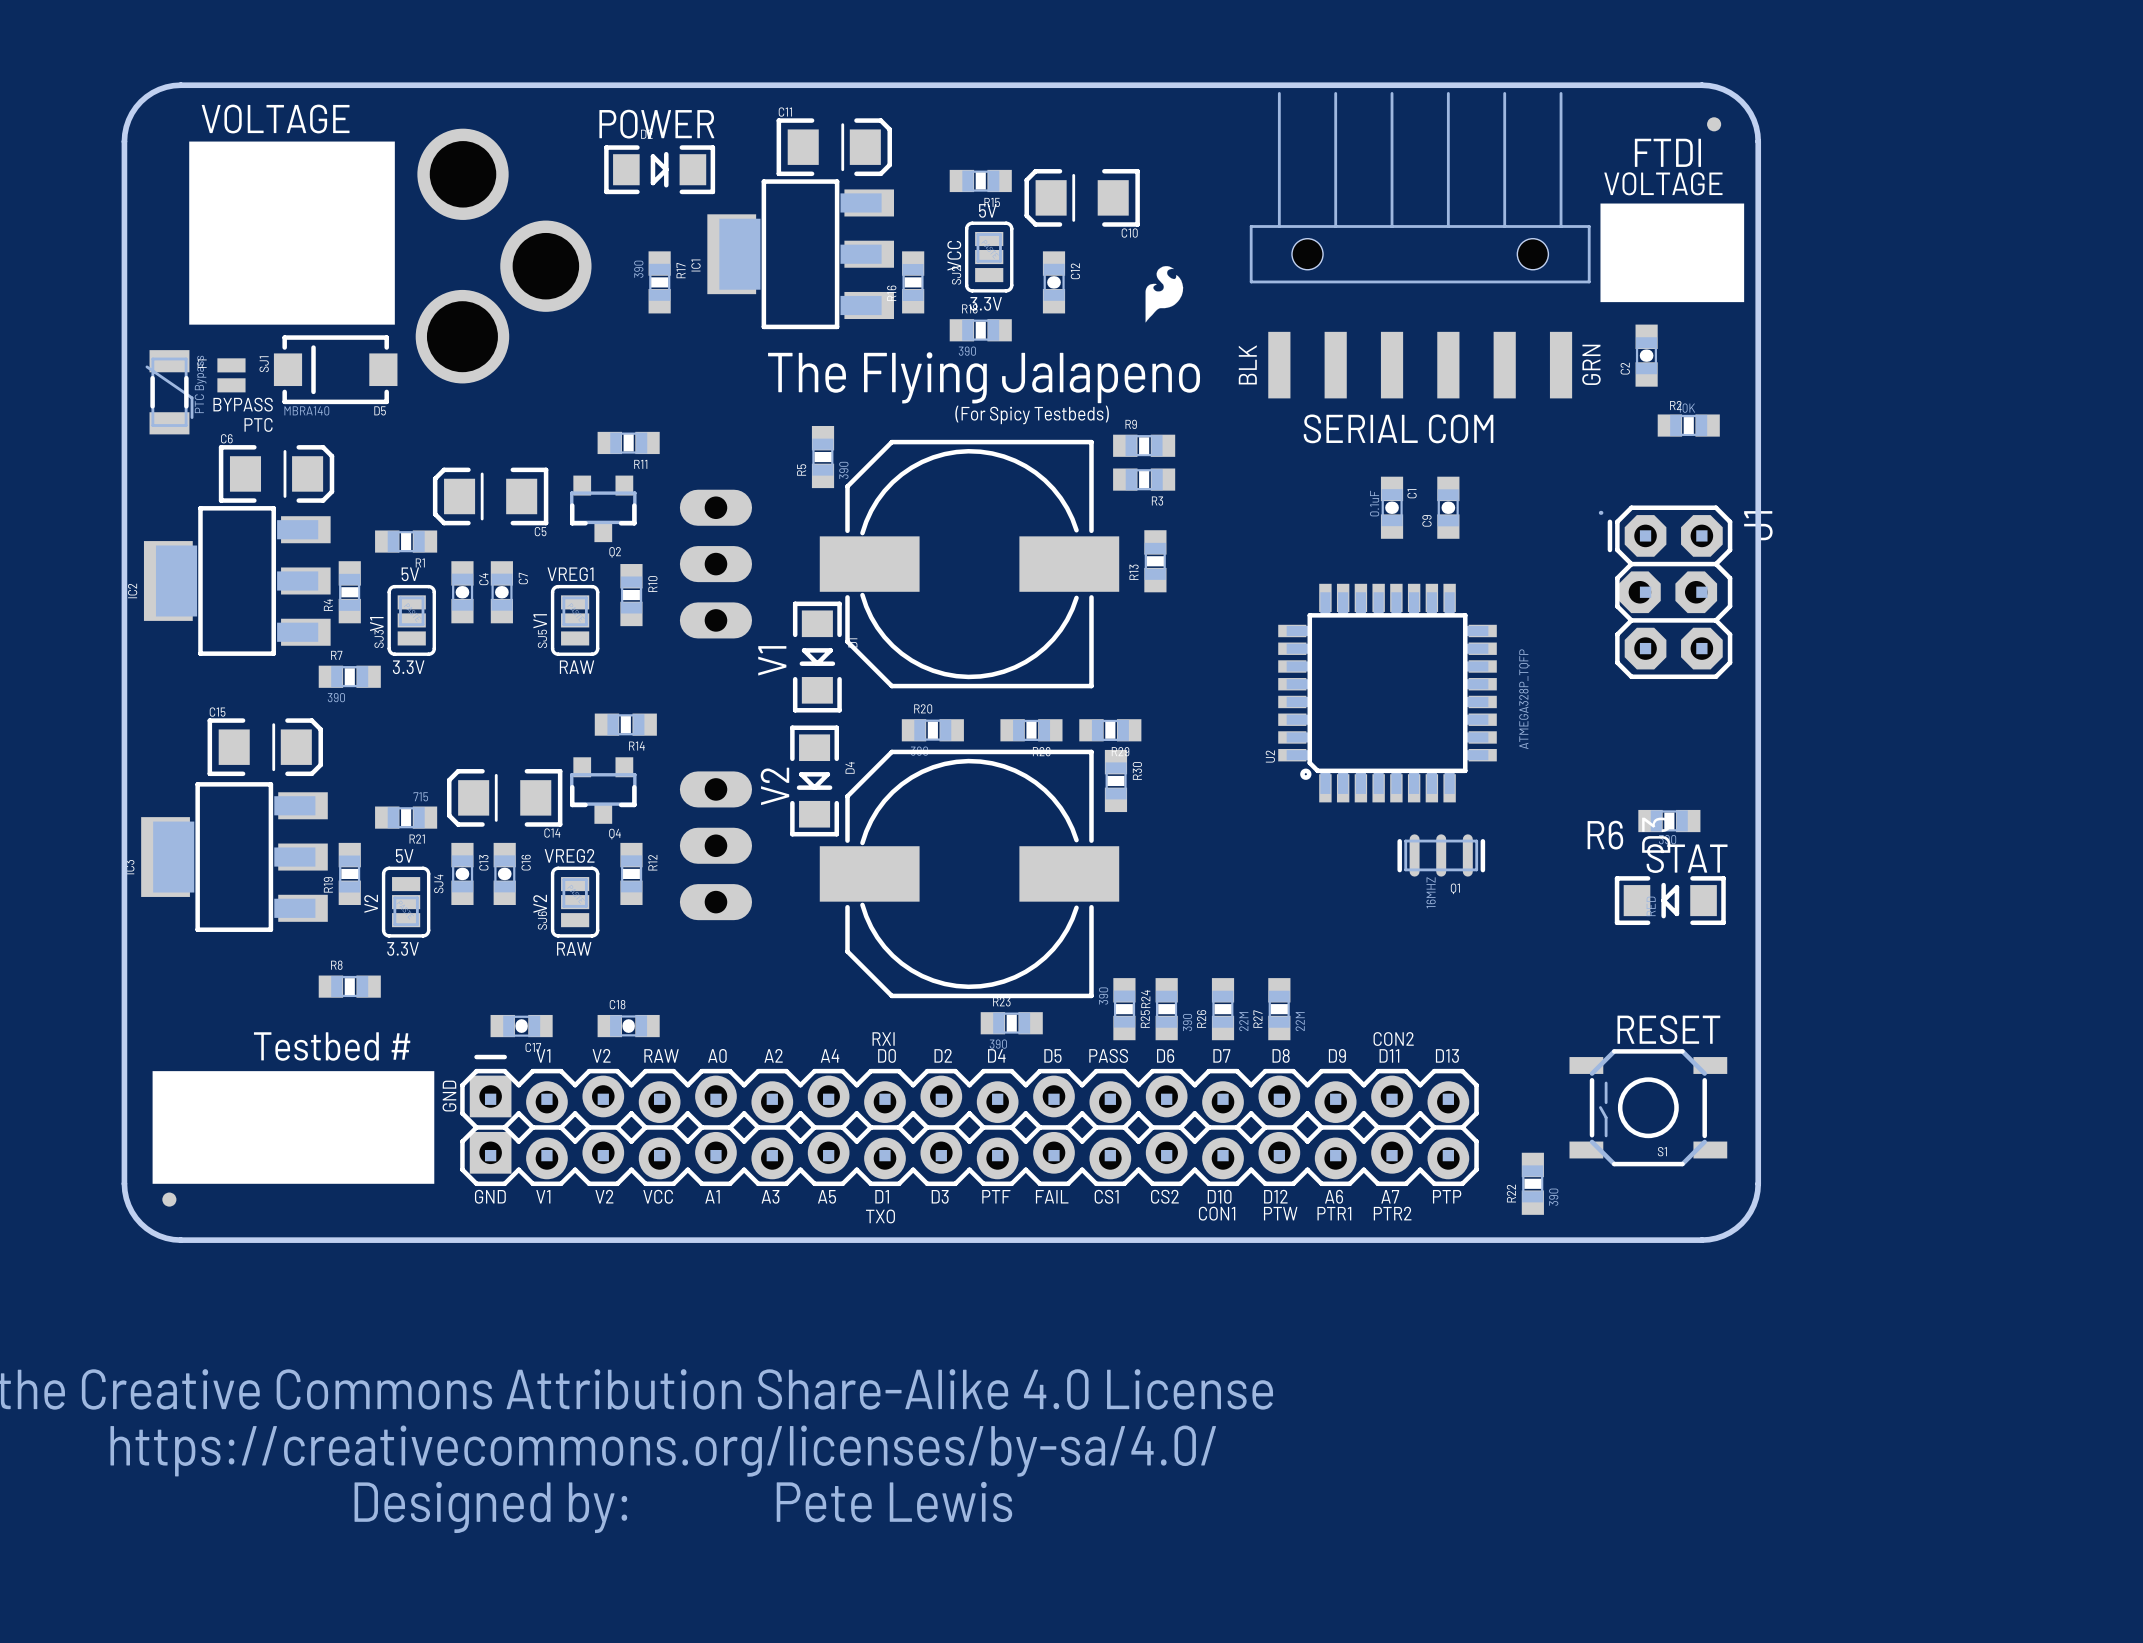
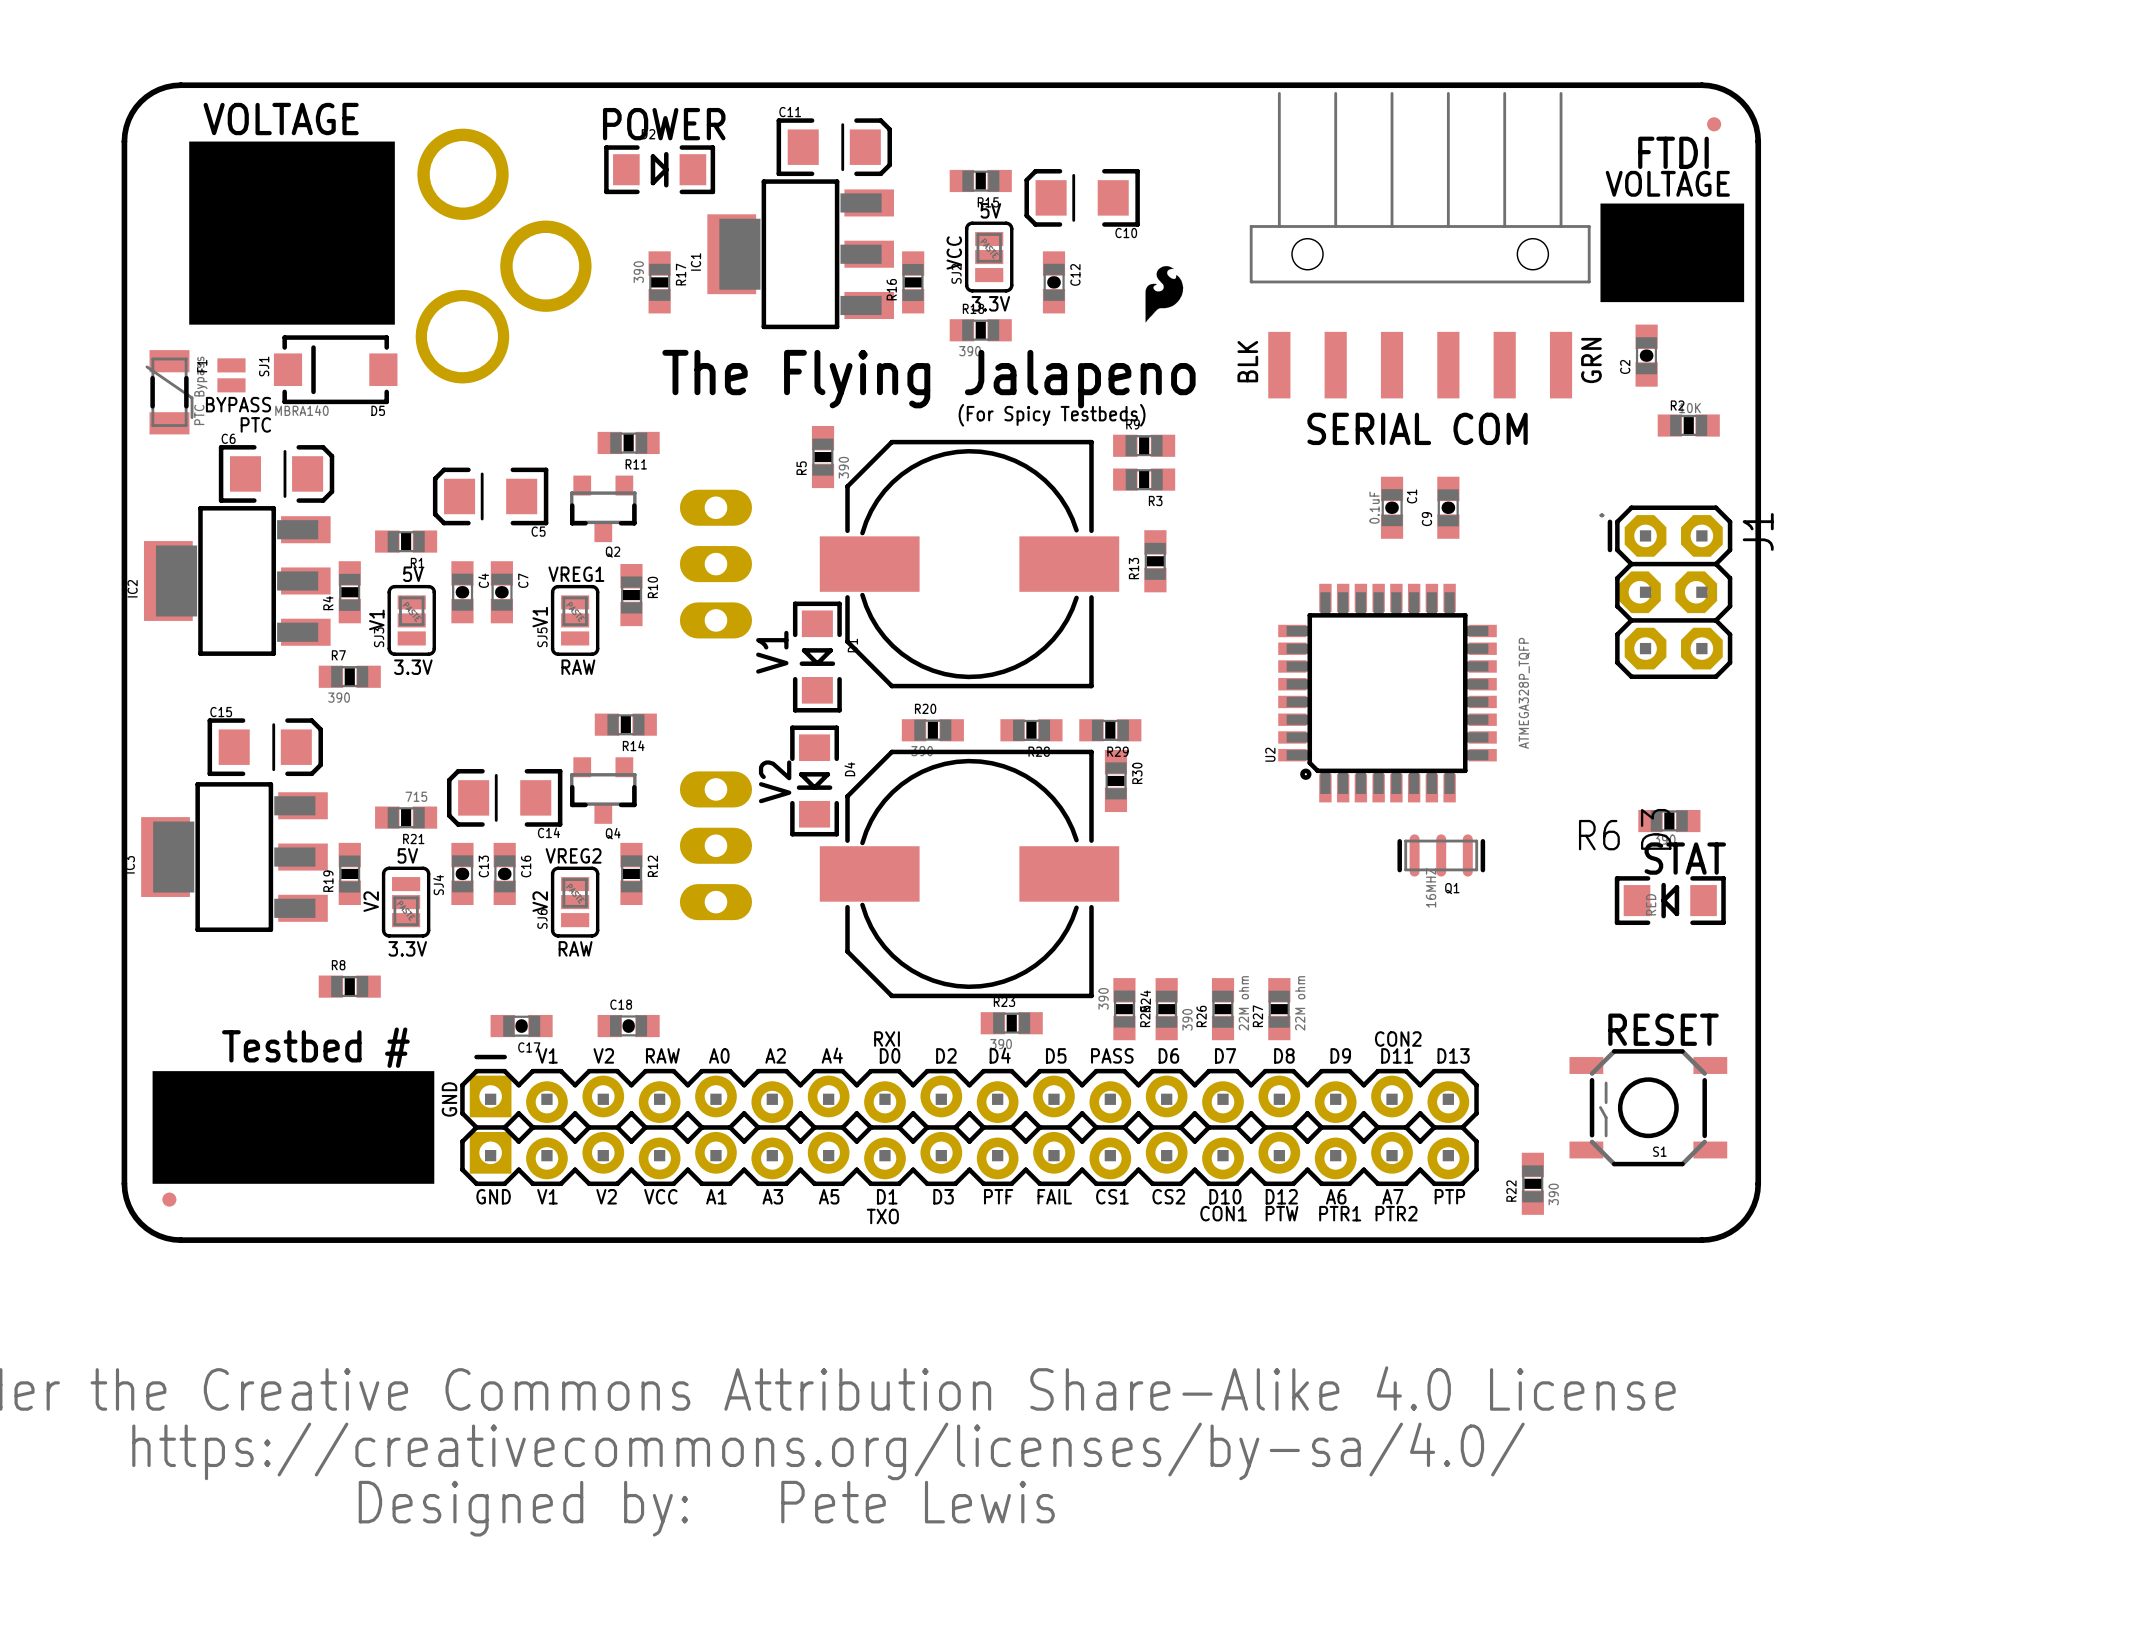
R26 value: 22M (1243, 1021) -> 22M ohm (1243, 1003)
R27 value: 22M (1300, 1021) -> 22M ohm (1300, 1003)

